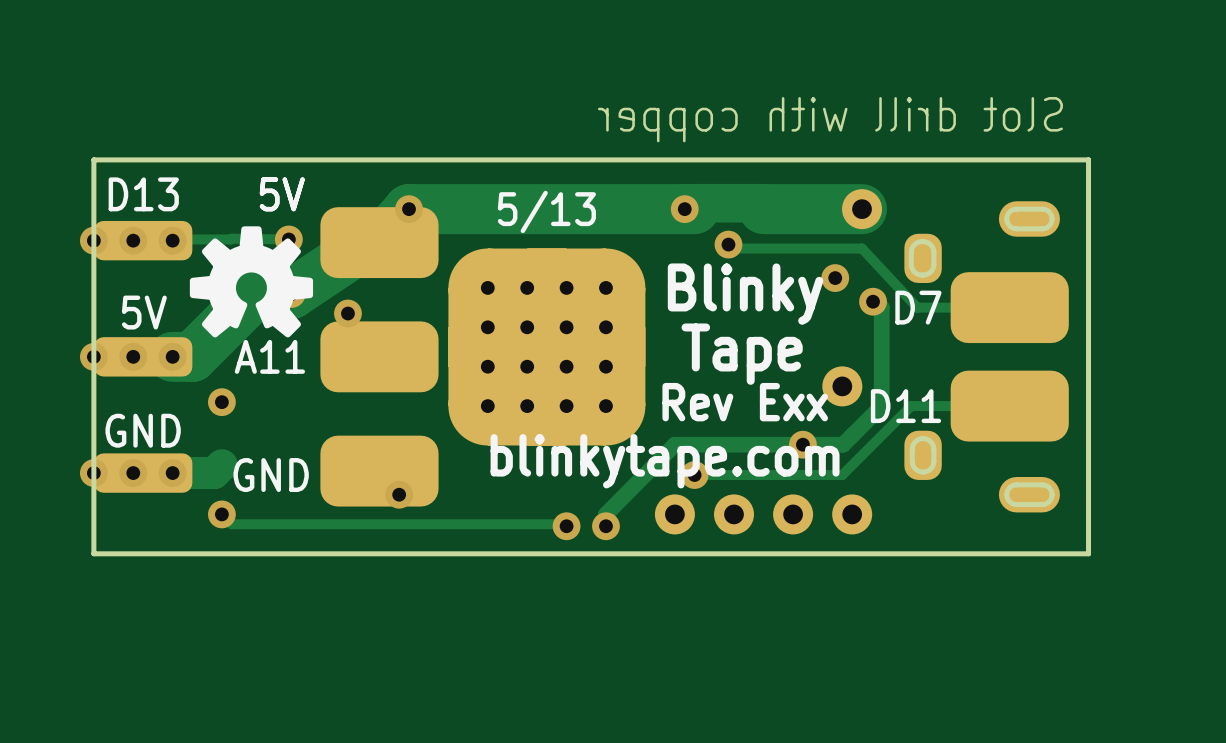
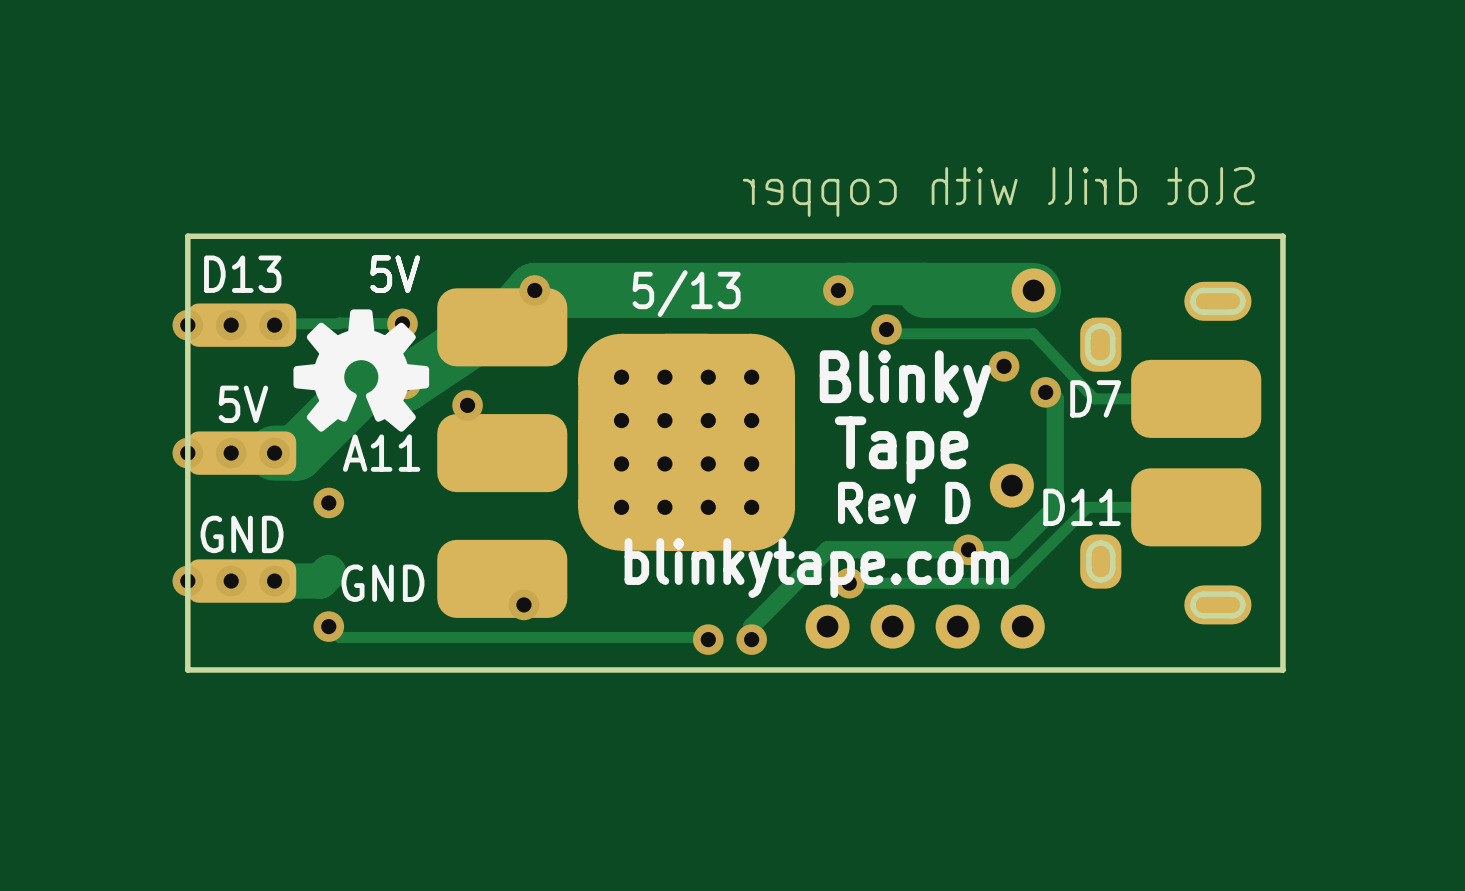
text: Rev Exx (745, 402) -> Rev D (904, 502)

